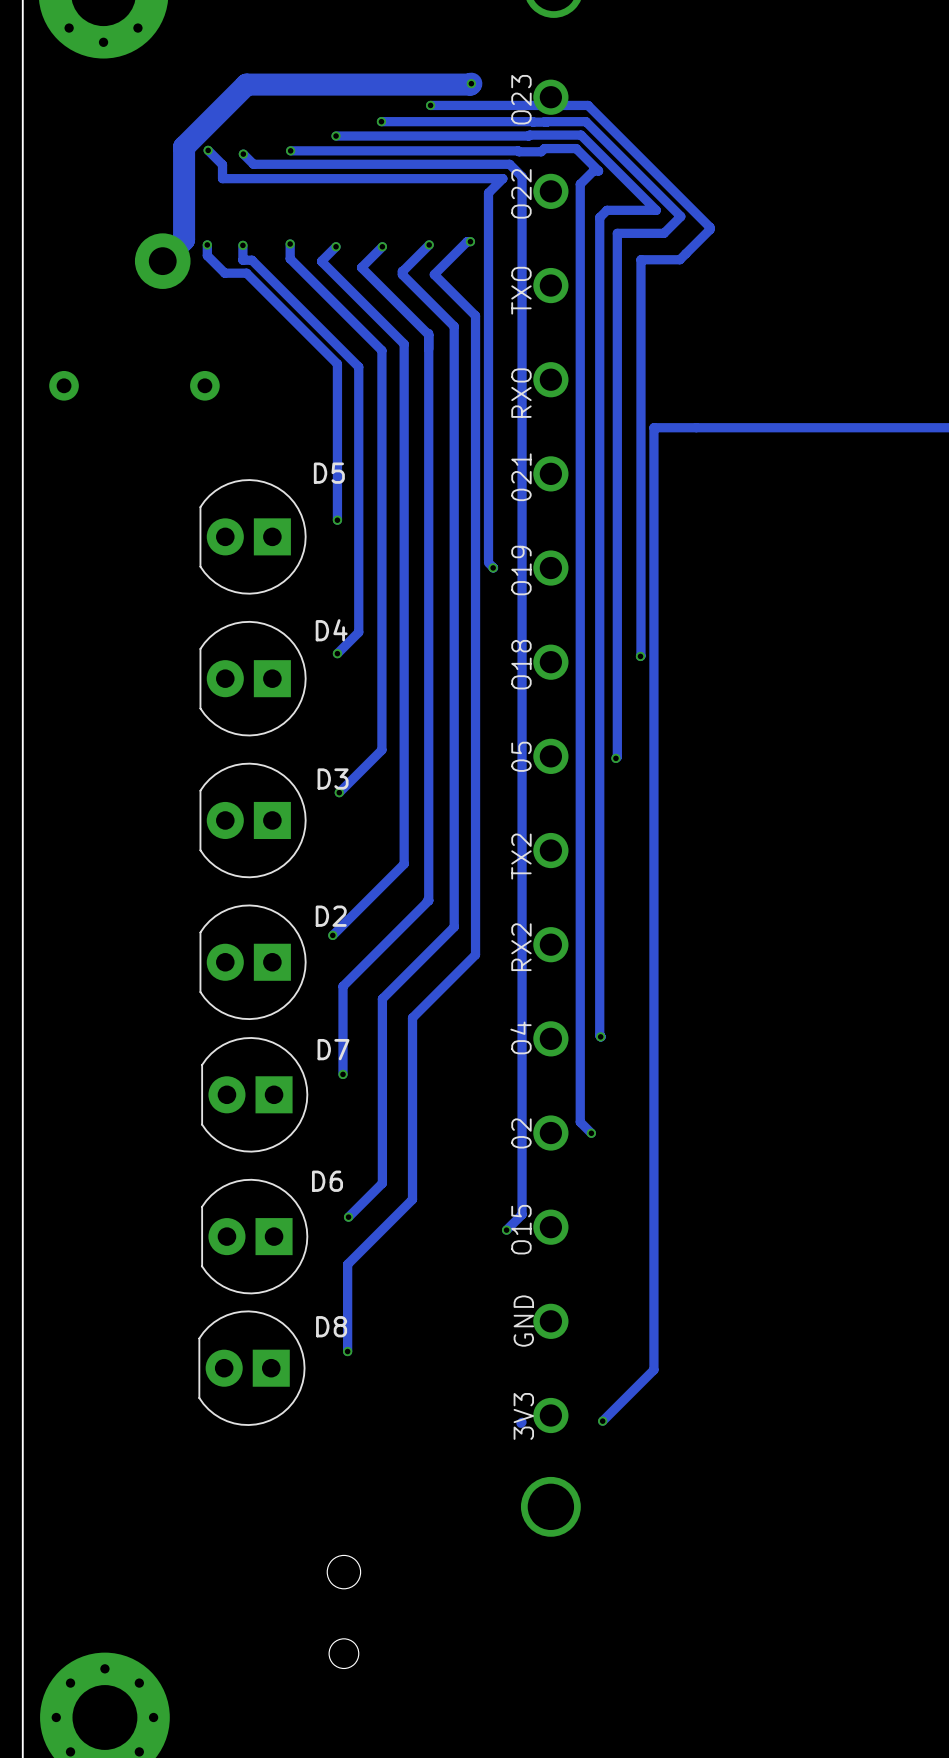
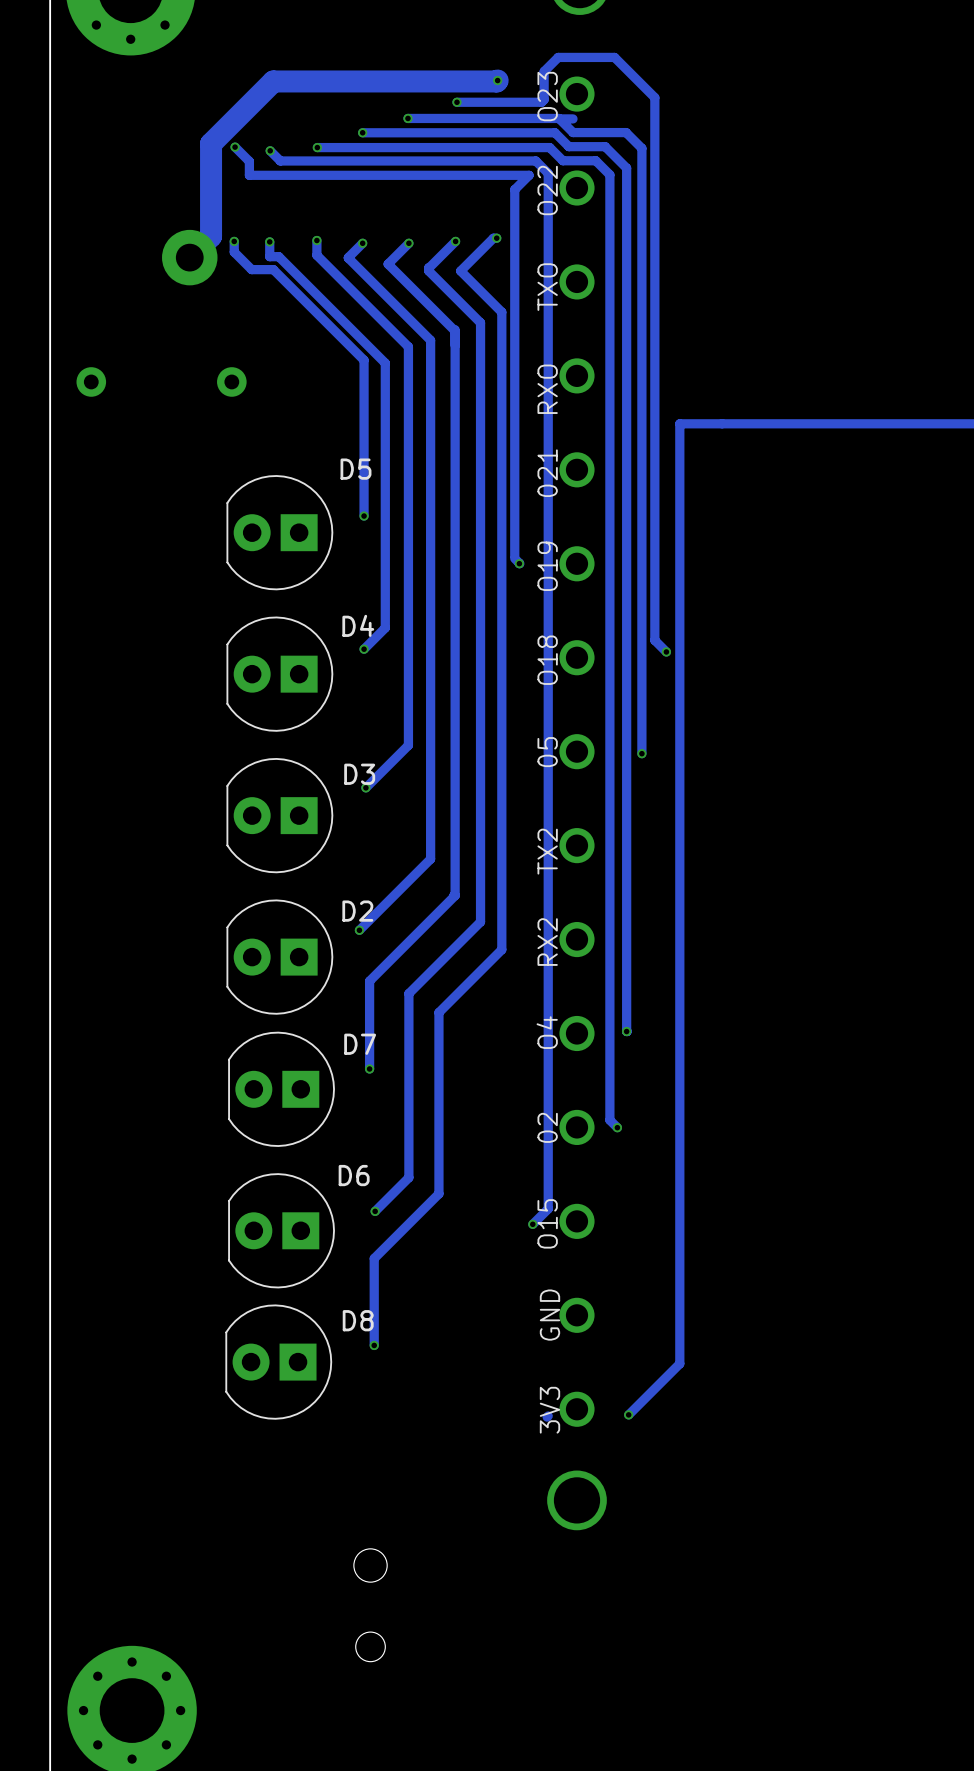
track: (515, 105) (588, 105) (710, 227) (710, 229) (679, 259) (640, 259) (640, 656) -> (541, 102) (544, 99) (544, 71) (558, 57) (614, 57) (654, 97) (654, 640) (666, 651)
track: (545, 122) (585, 121) (600, 135) -> (559, 118) (573, 132) (626, 132)
track: (528, 136) (581, 135) (656, 210) (606, 210) (599, 217) (600, 1036) -> (554, 132) (568, 146) (605, 146) (626, 168) (626, 1031)
track: (518, 150) (541, 151) (544, 148) (576, 148) (598, 171) (593, 171) (580, 184) (580, 1122) (583, 1125) -> (544, 147) (549, 147) (562, 160) (595, 160) (609, 174) (609, 1120)
track: (615, 151) (680, 216) (664, 233) (617, 233) (615, 758) -> (641, 148) (641, 753)

